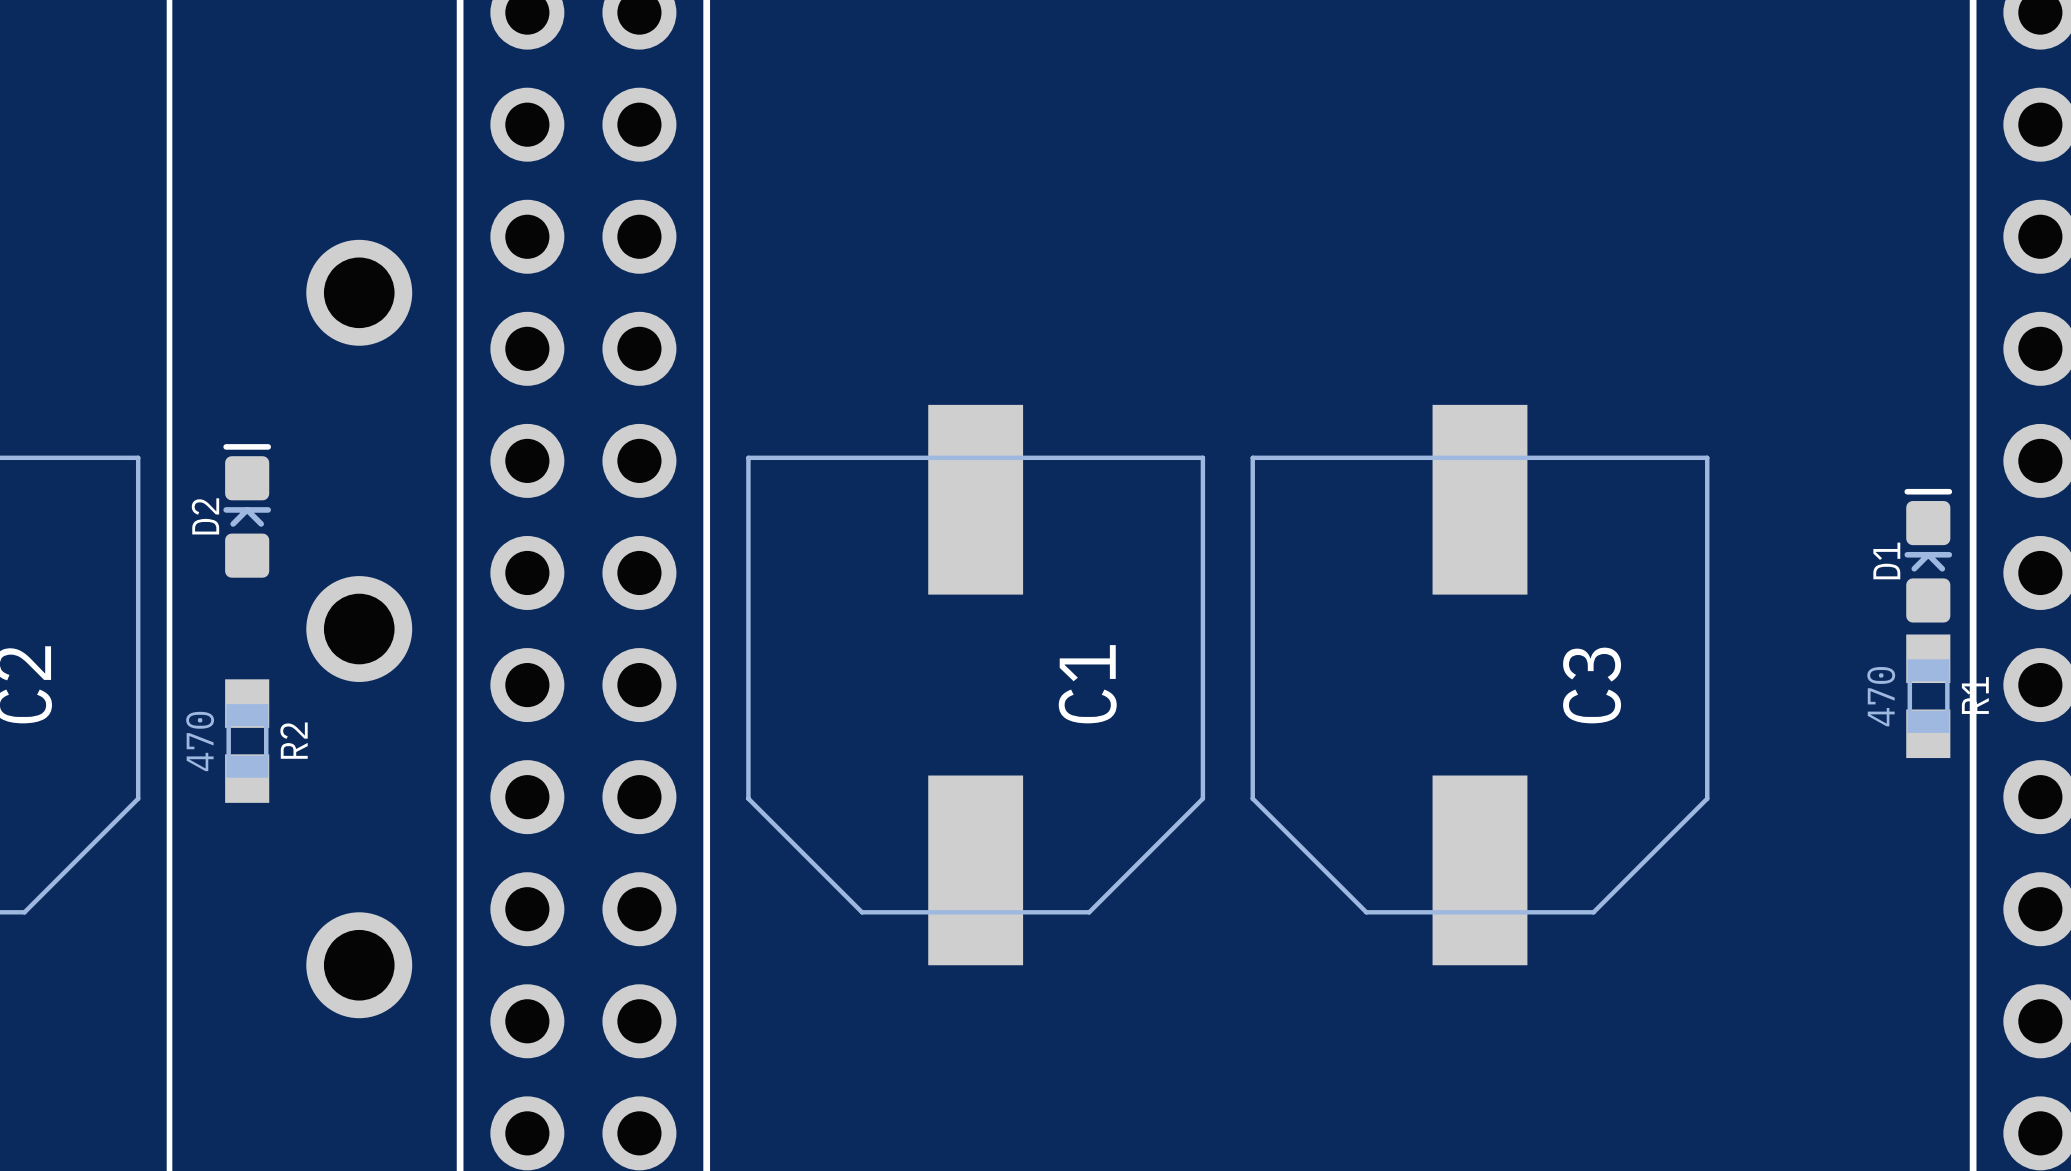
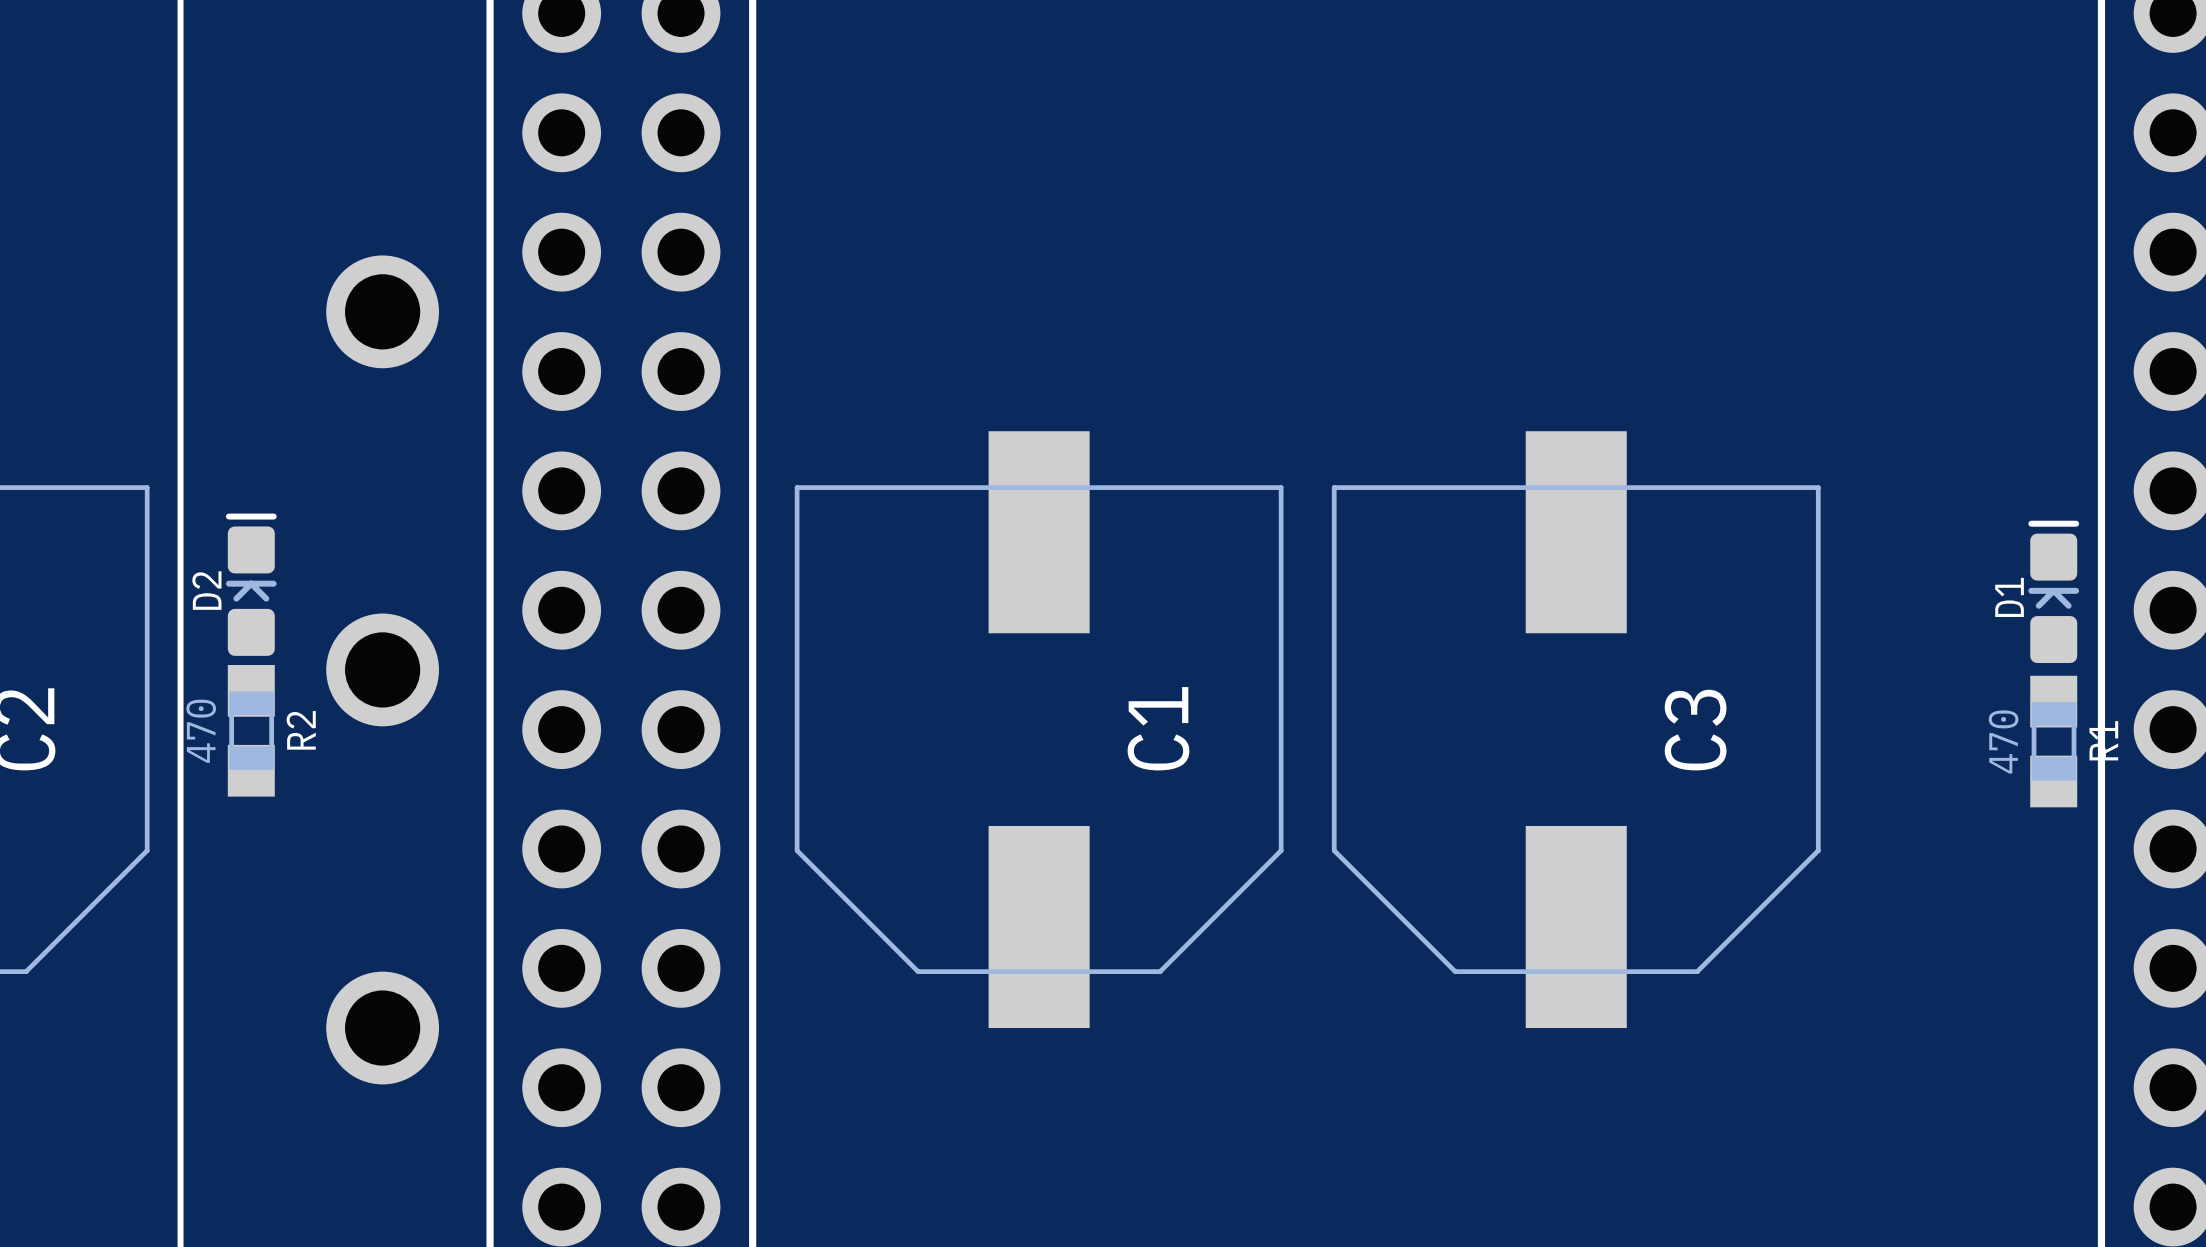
D2 position: (247, 510) -> (251, 584)
R2 position: (247, 741) -> (251, 730)

